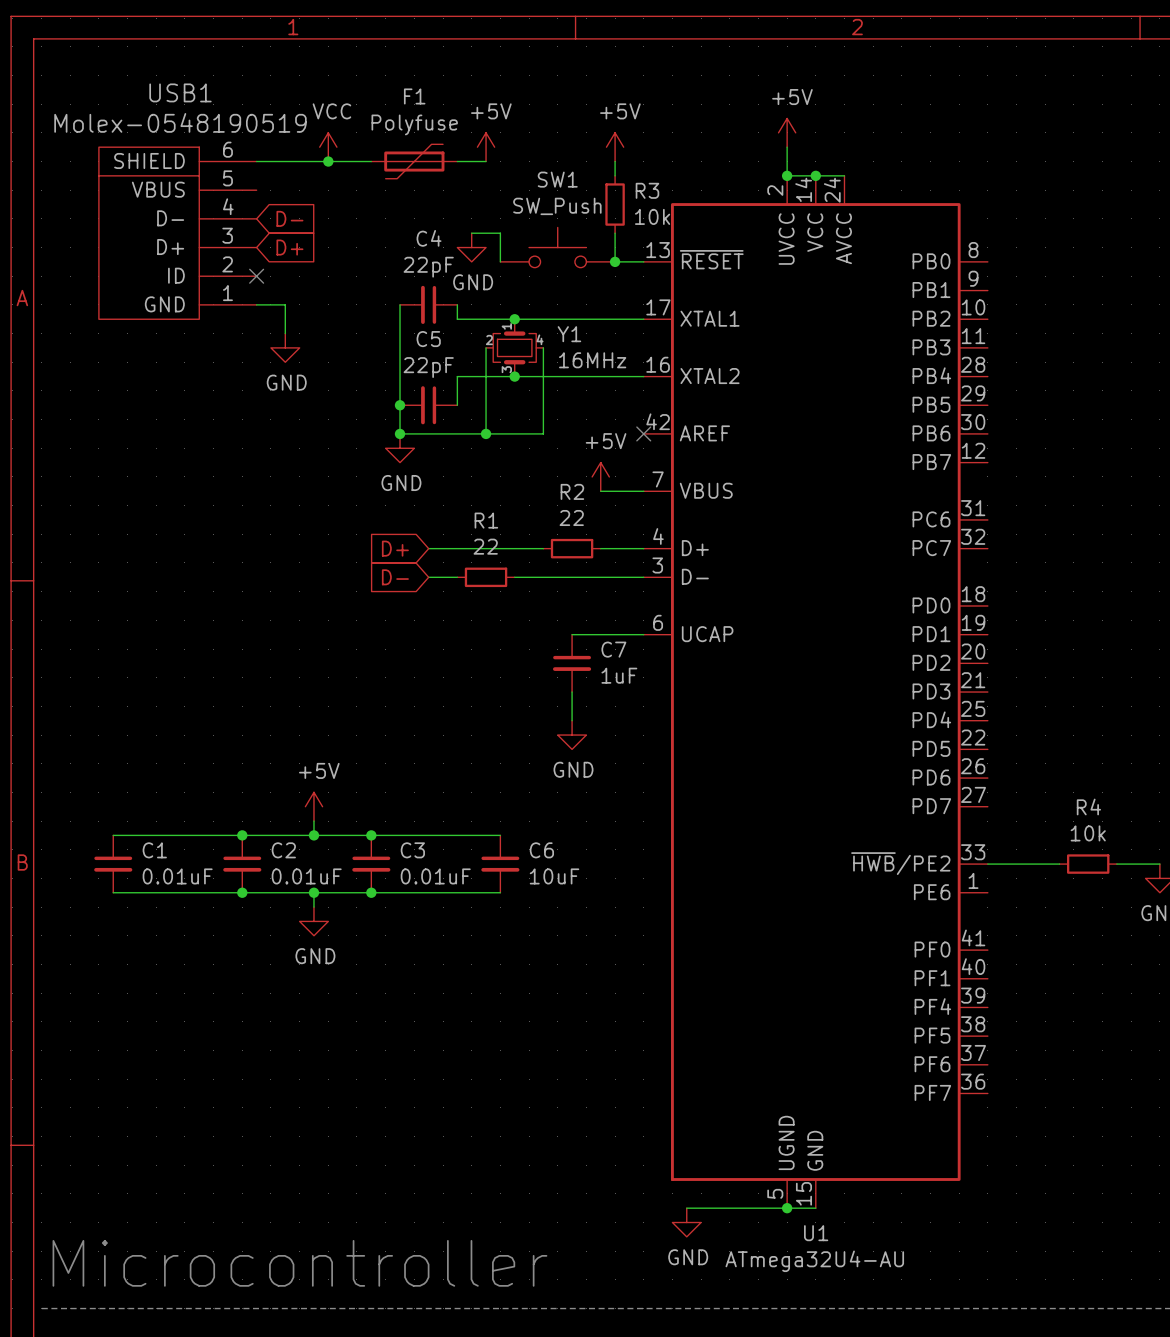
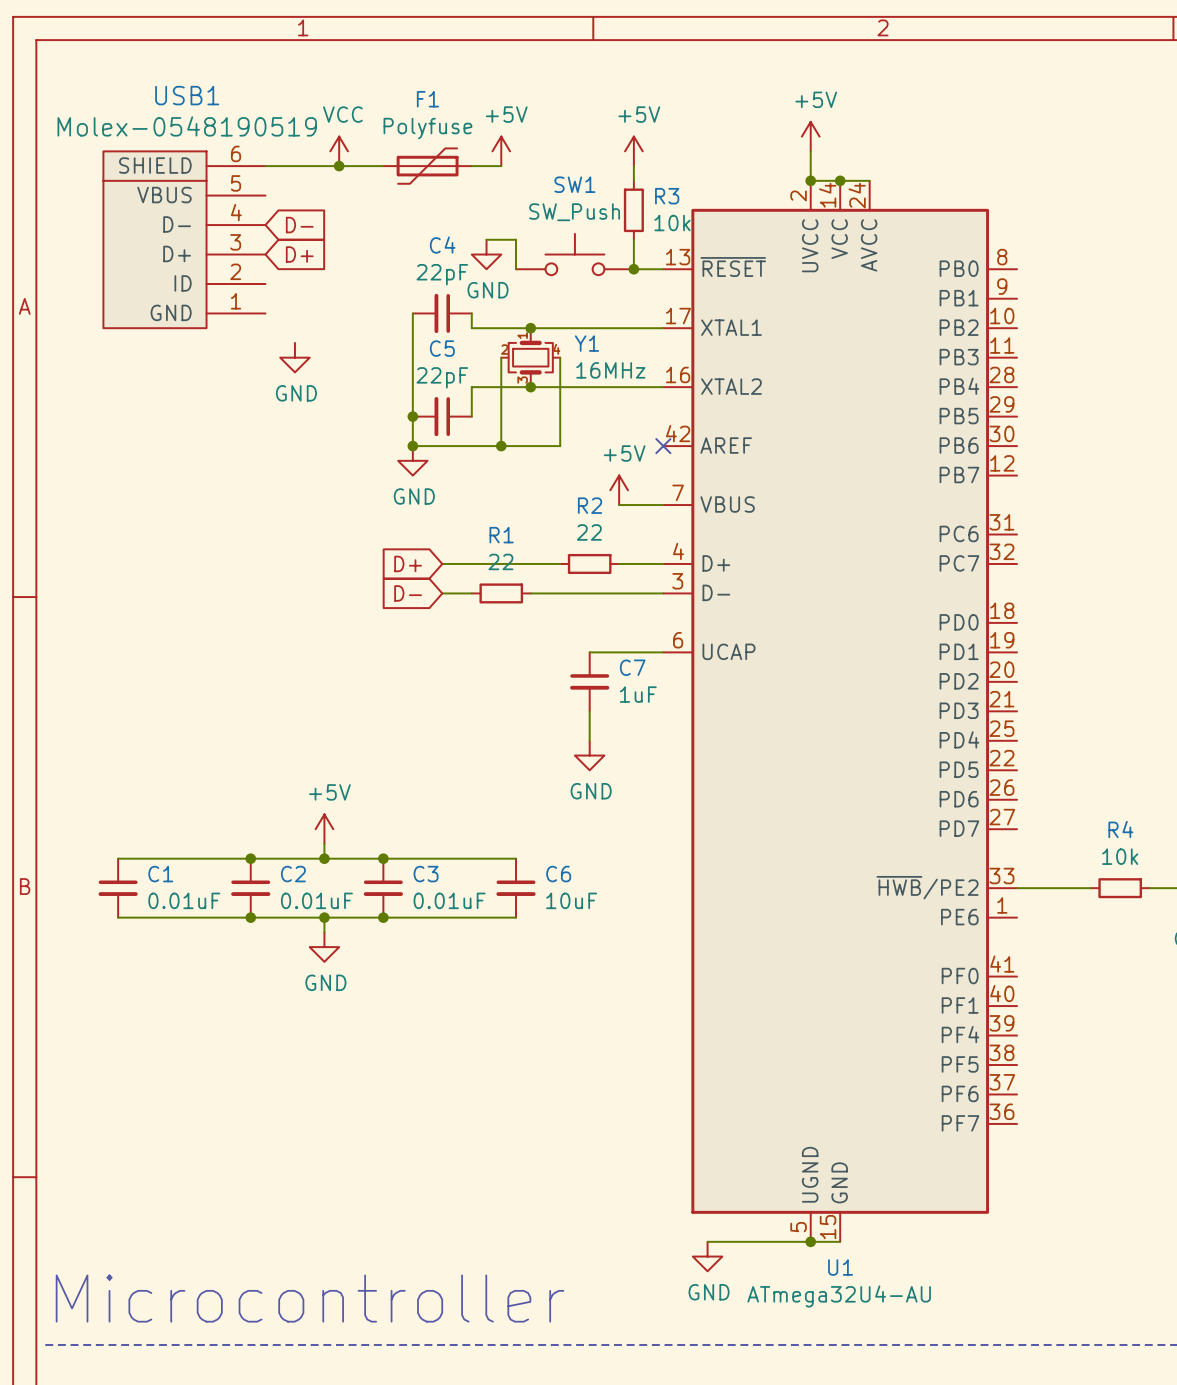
no-connect mark: (256, 276) -> none
wire: (256, 304) (285, 304) (285, 333) -> none

